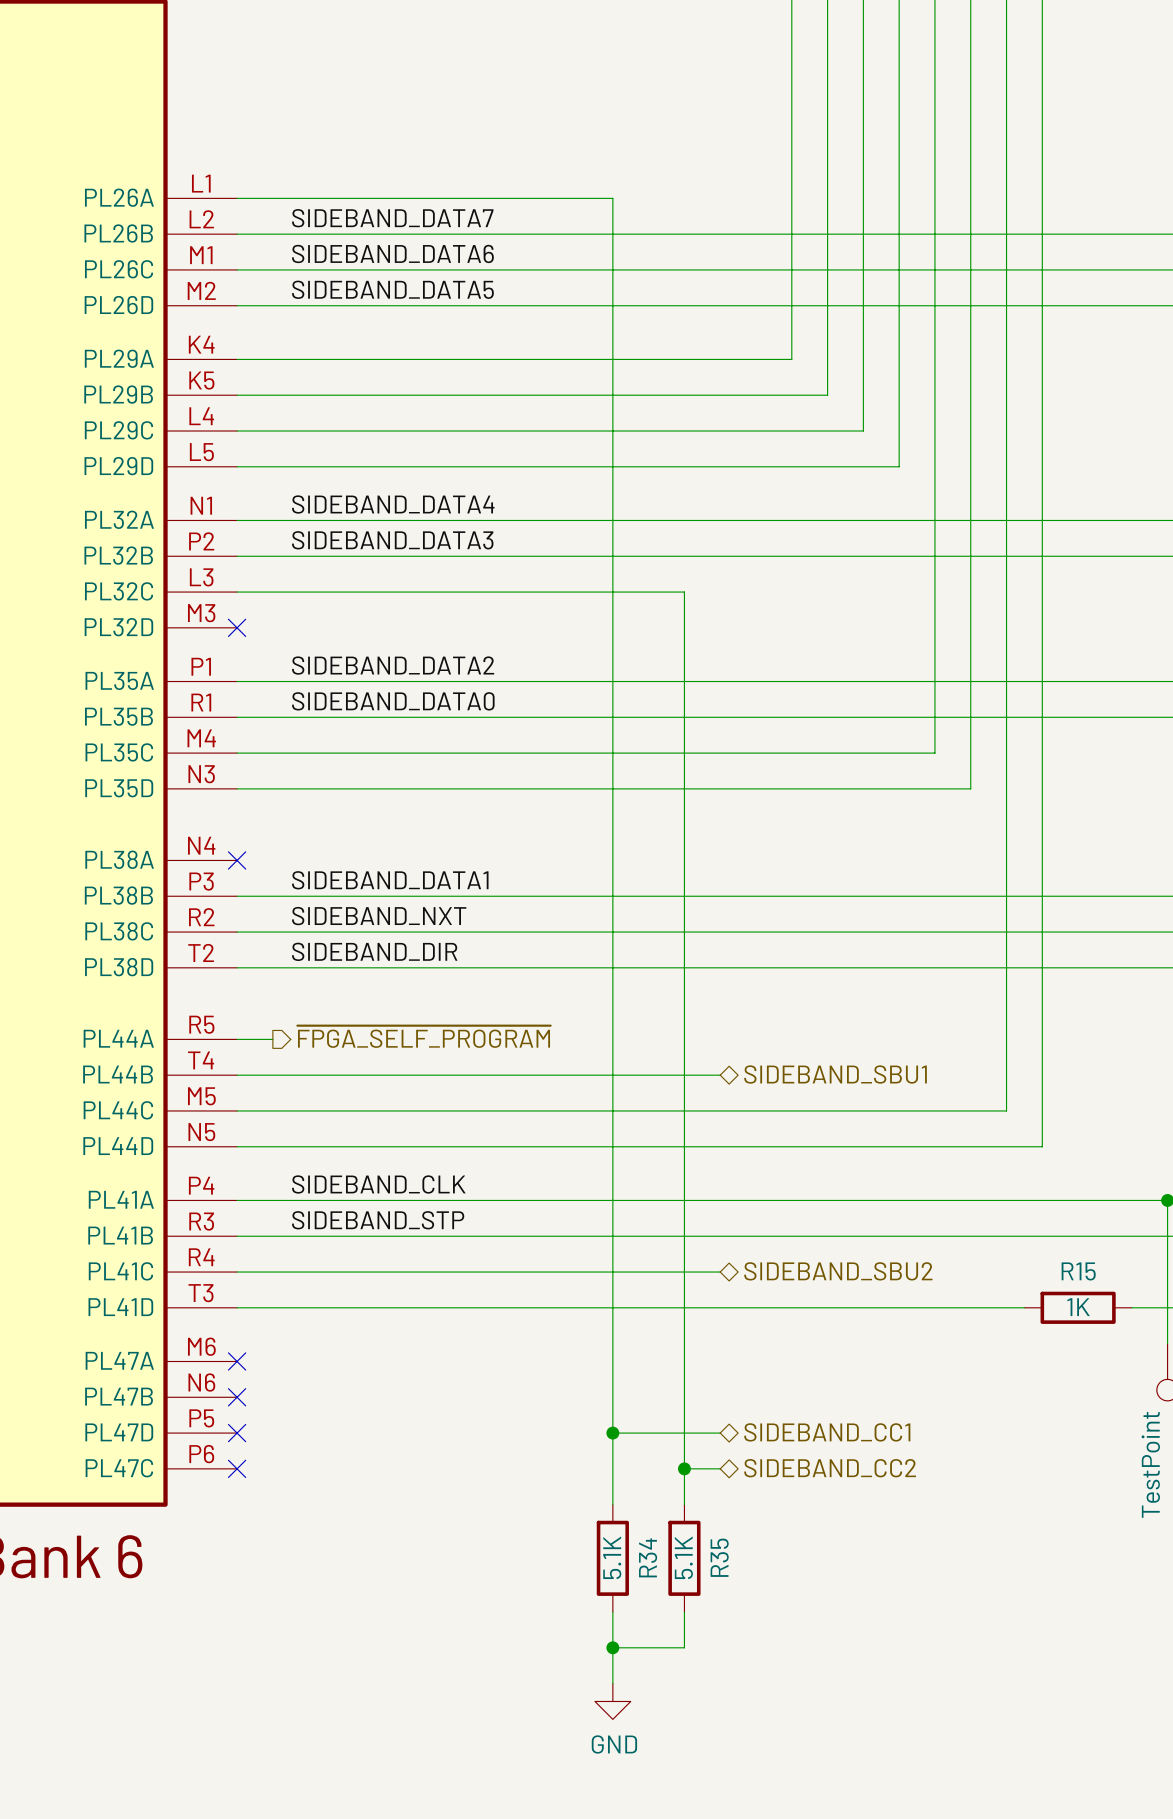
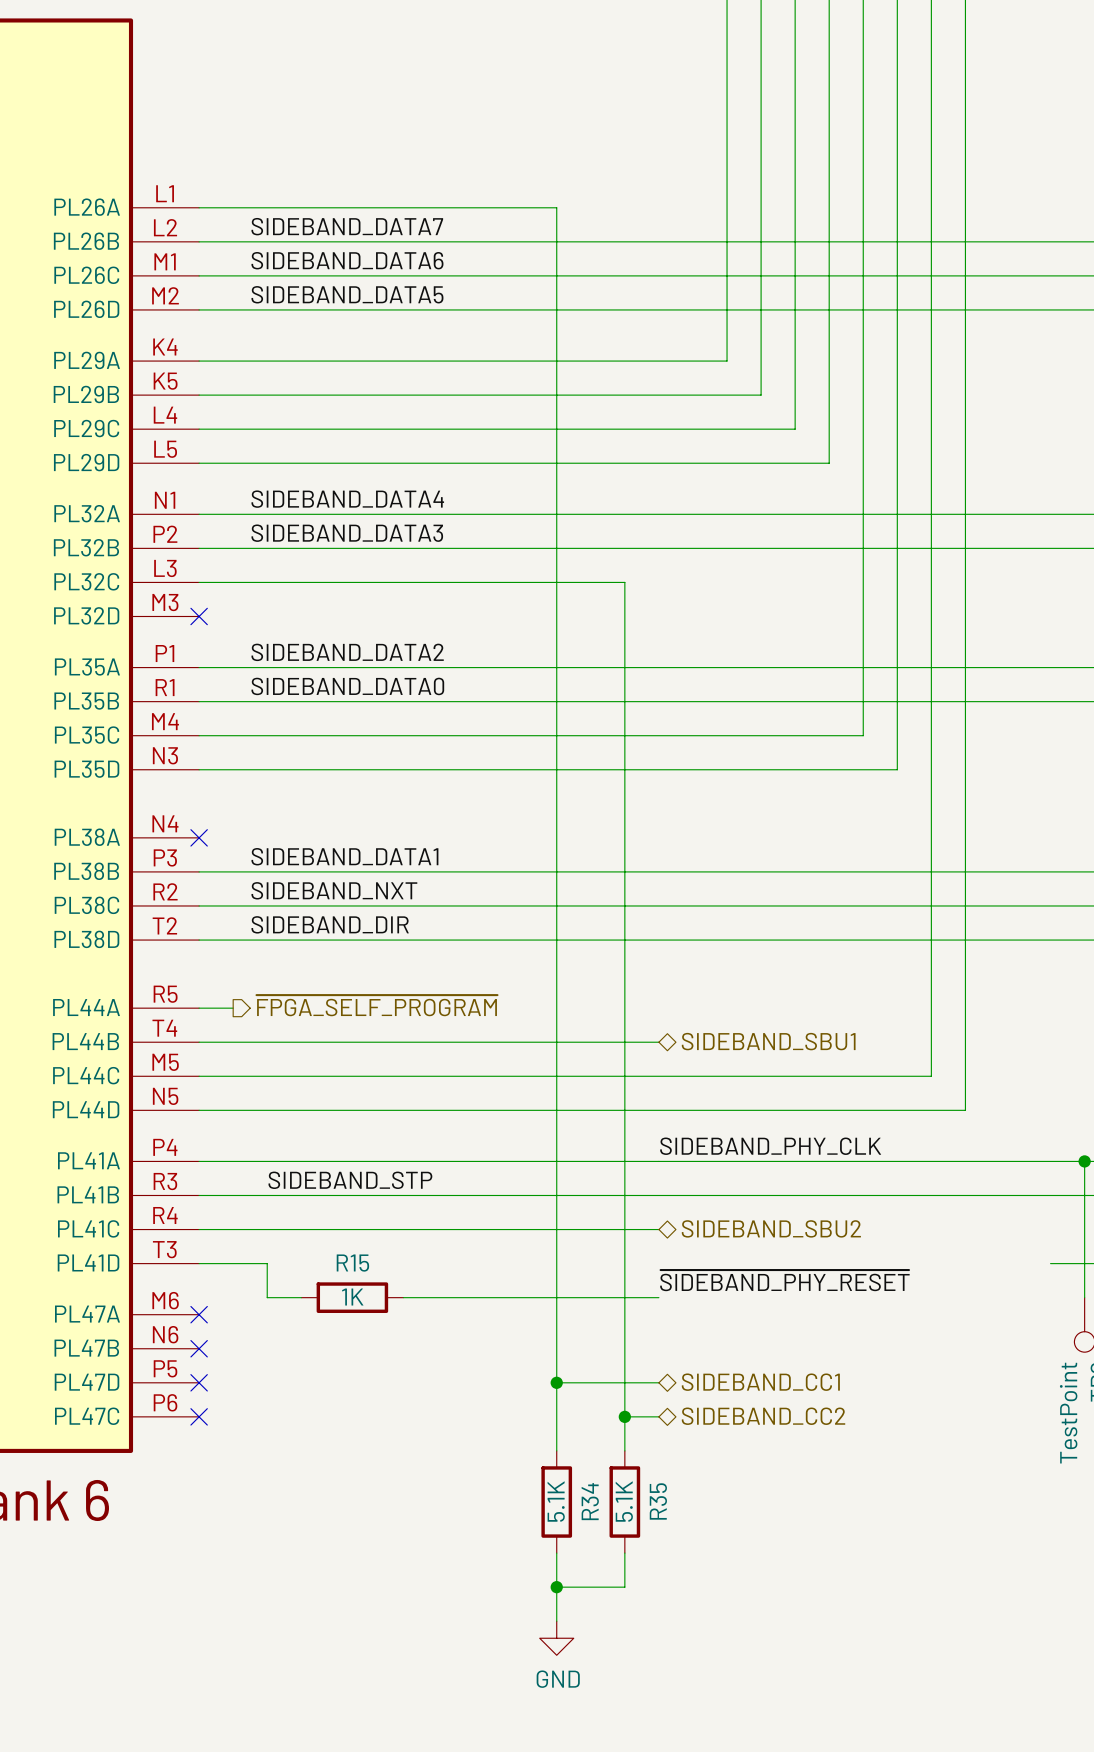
label: SIDEBAND_CLK (378, 1184) -> none
label: none -> SIDEBAND_PHY_CLK (770, 1146)
label position: SIDEBAND_STP (378, 1220) -> SIDEBAND_STP (350, 1180)
wire: (308, 1307) (1024, 1307) -> (267, 1263) (267, 1297) (301, 1297)
R15 position: (1078, 1307) -> (352, 1297)
label: none -> ~{SIDEBAND_PHY_RESET} (784, 1280)
wire: none -> (403, 1297) (658, 1297)

